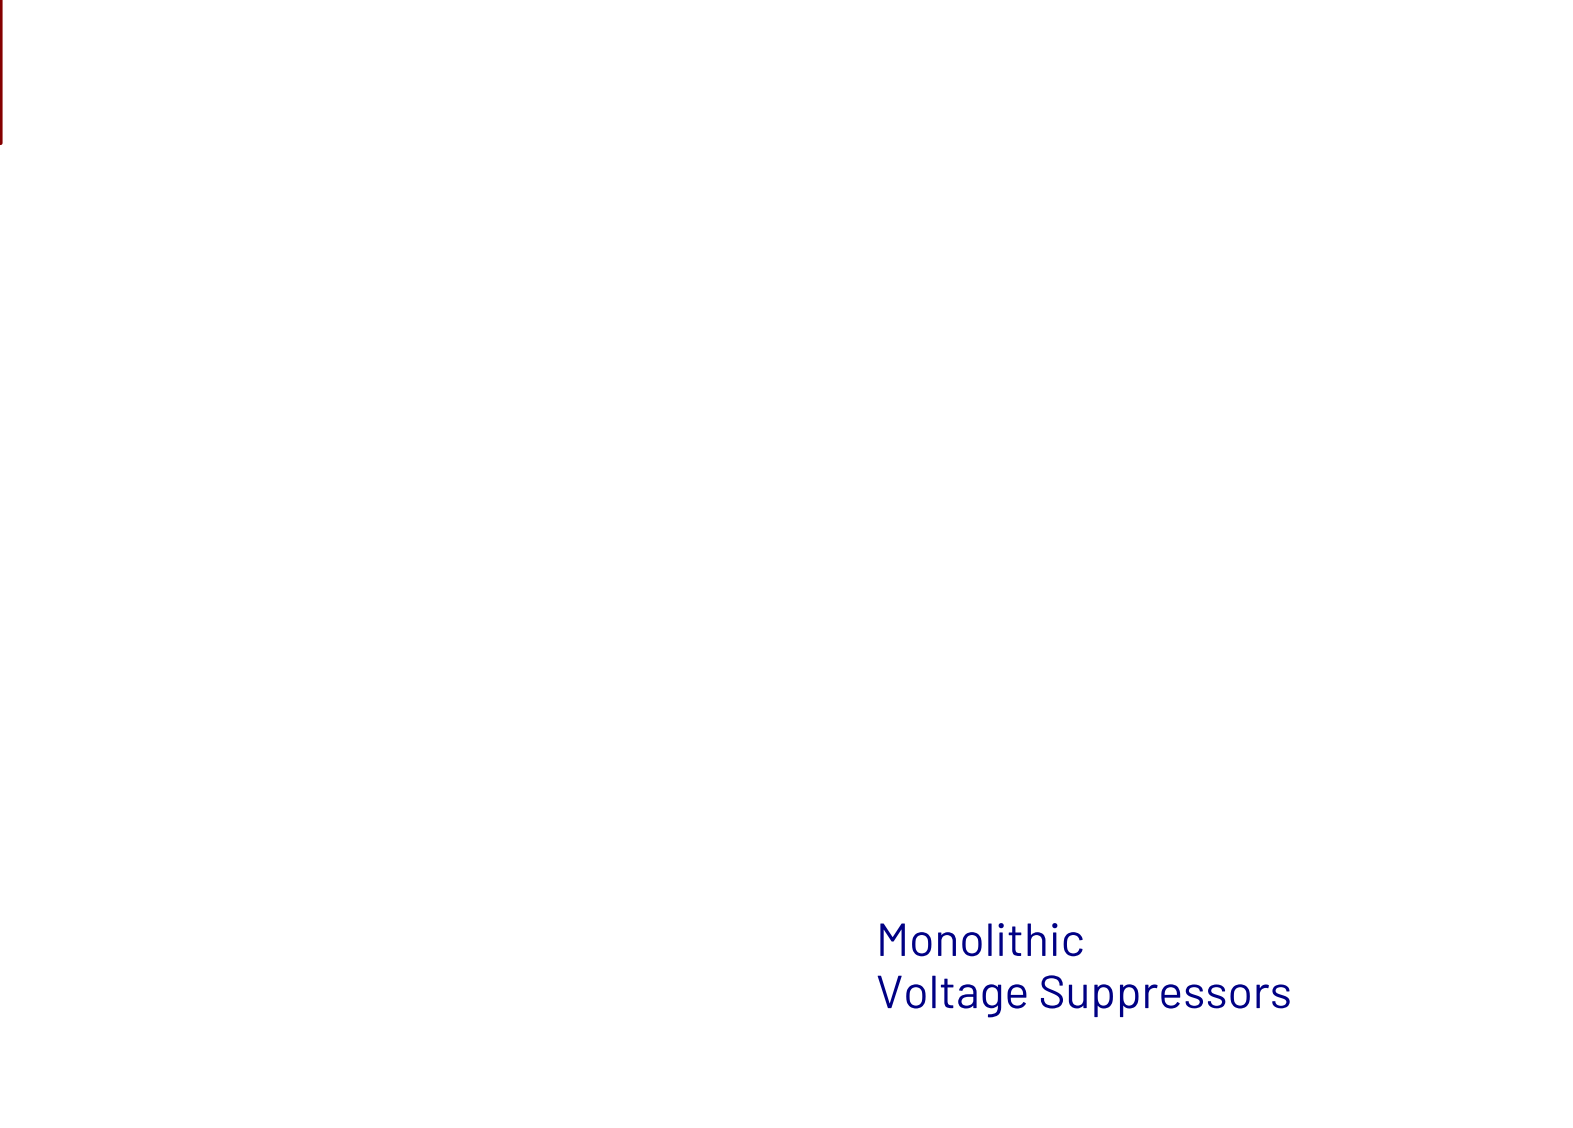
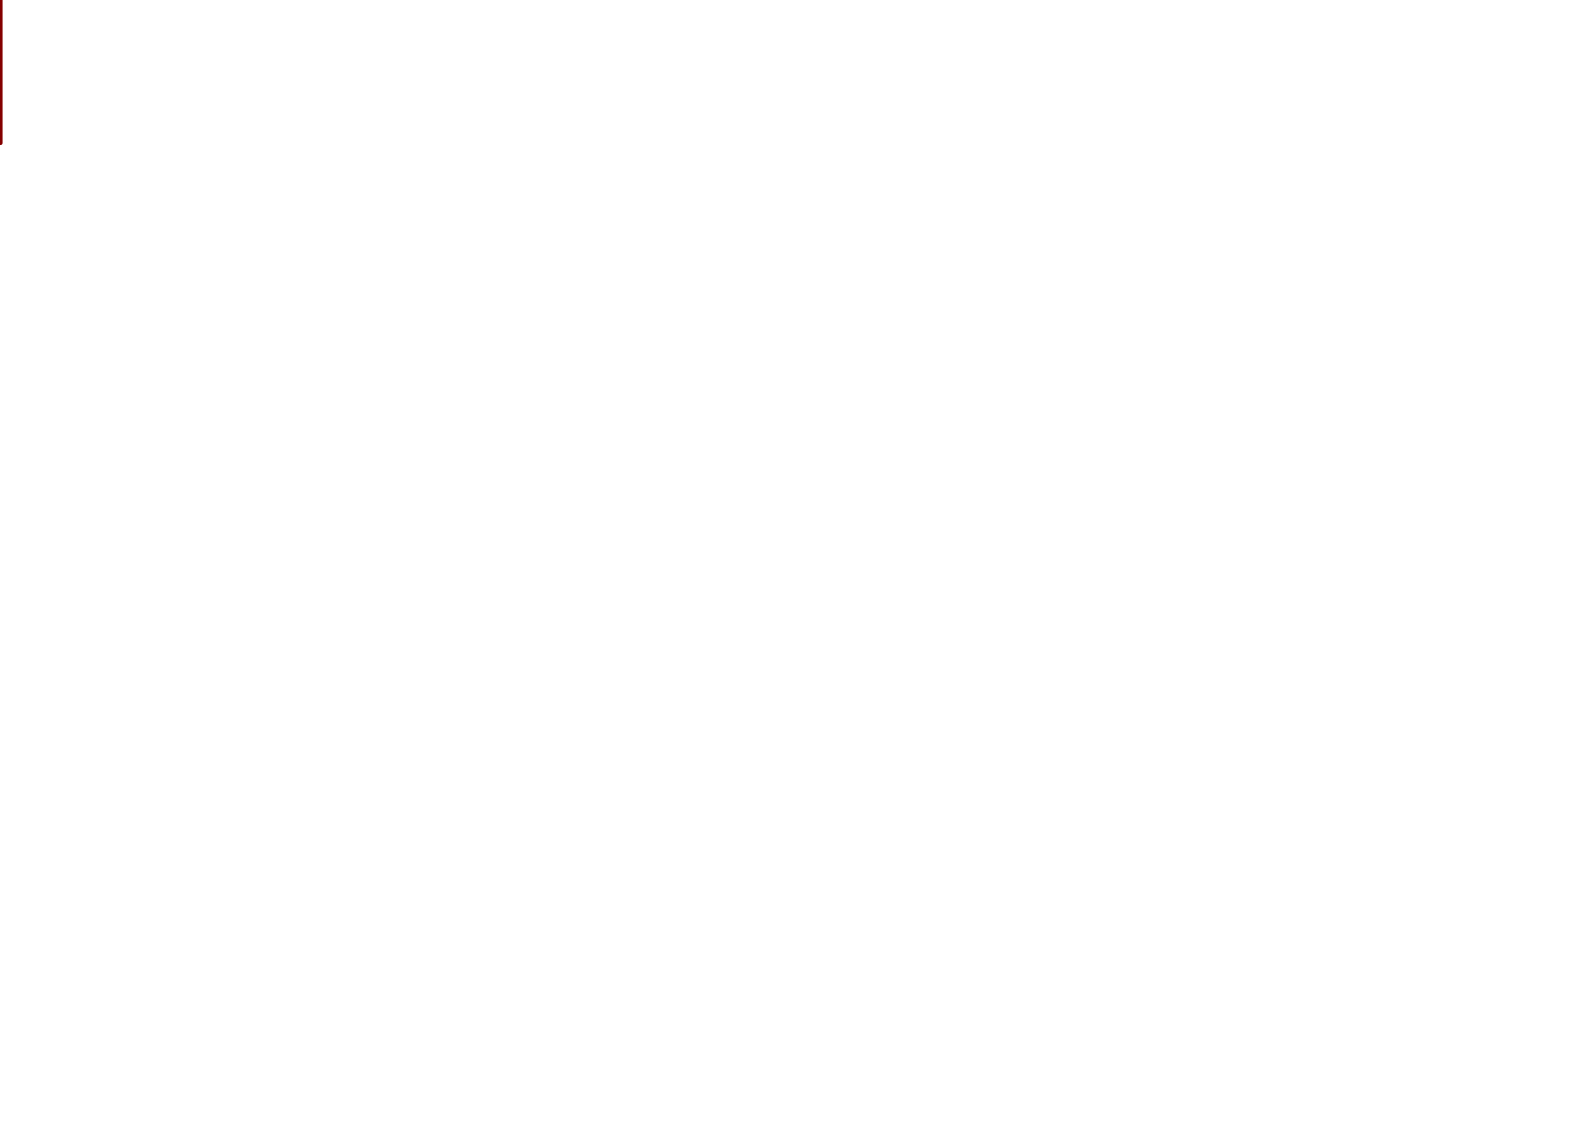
text: Monolithic (981, 939) -> none
text: Voltage Suppressors (1083, 996) -> none

